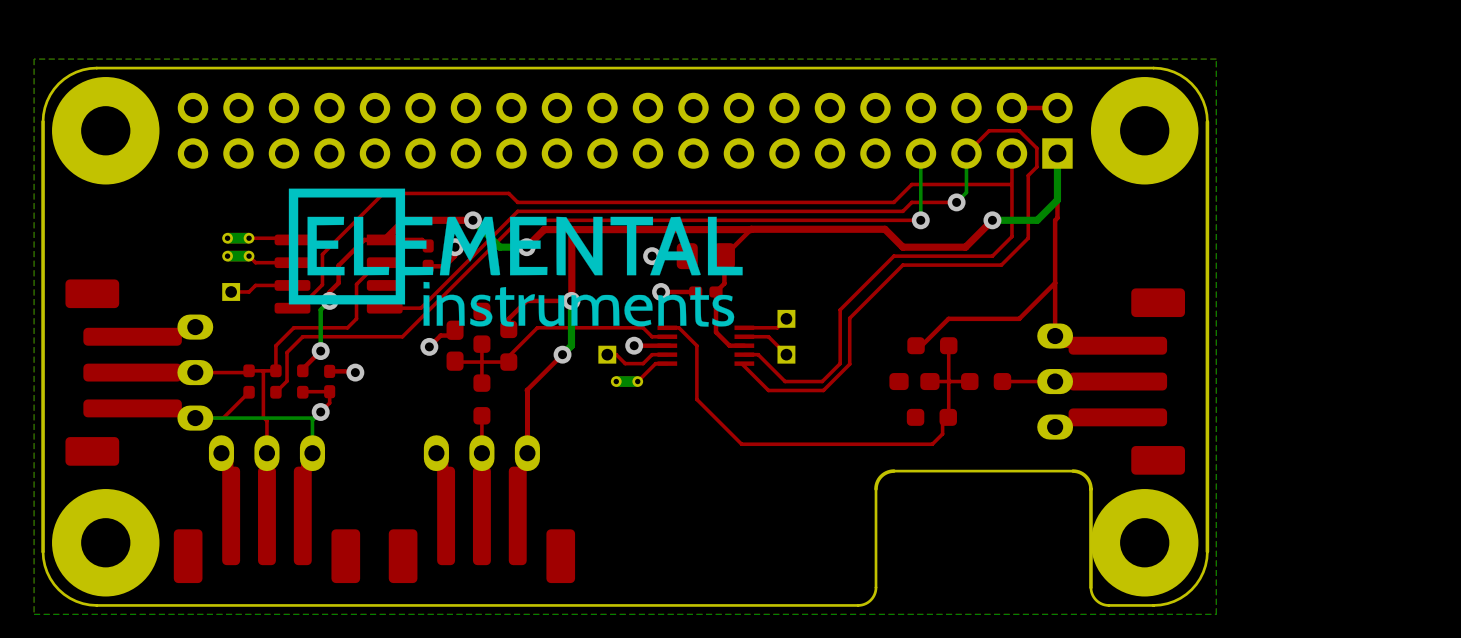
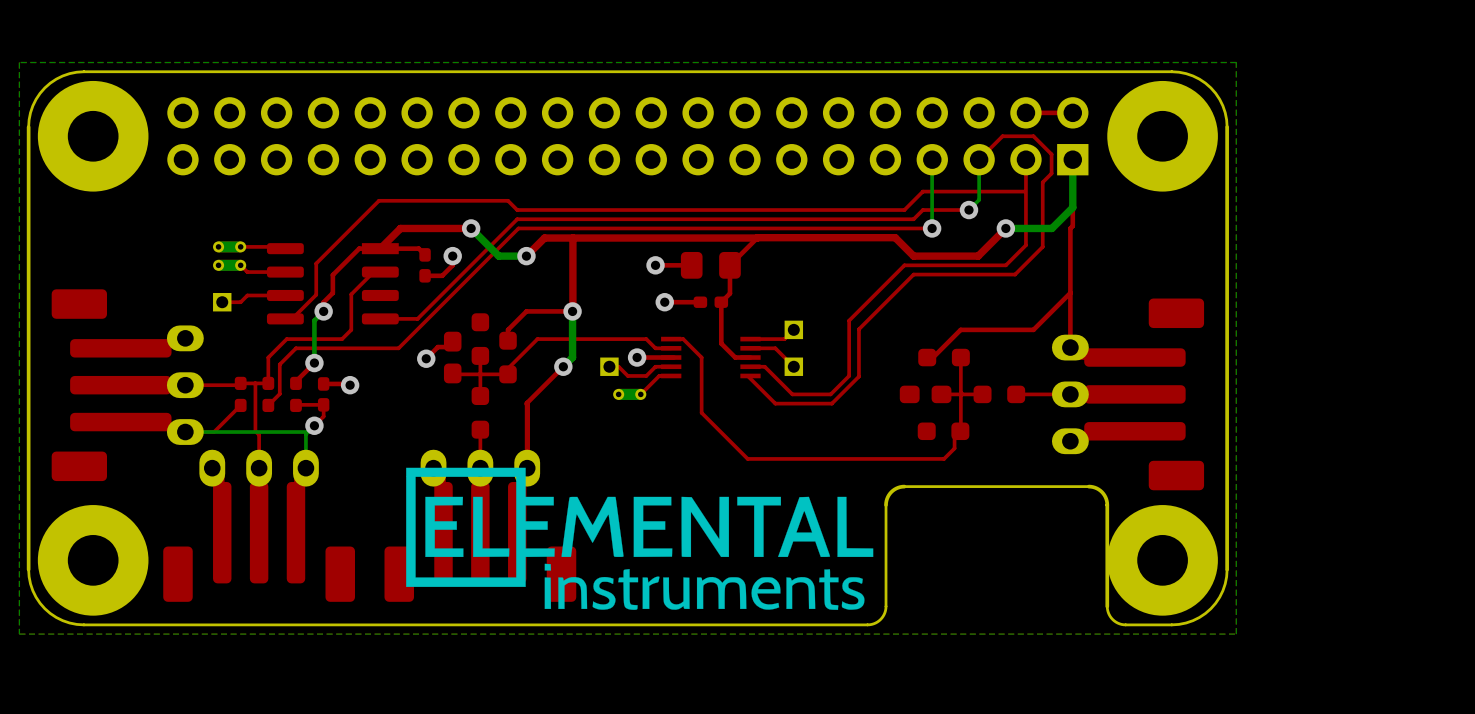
drawing position: (515, 257) -> (639, 538)

